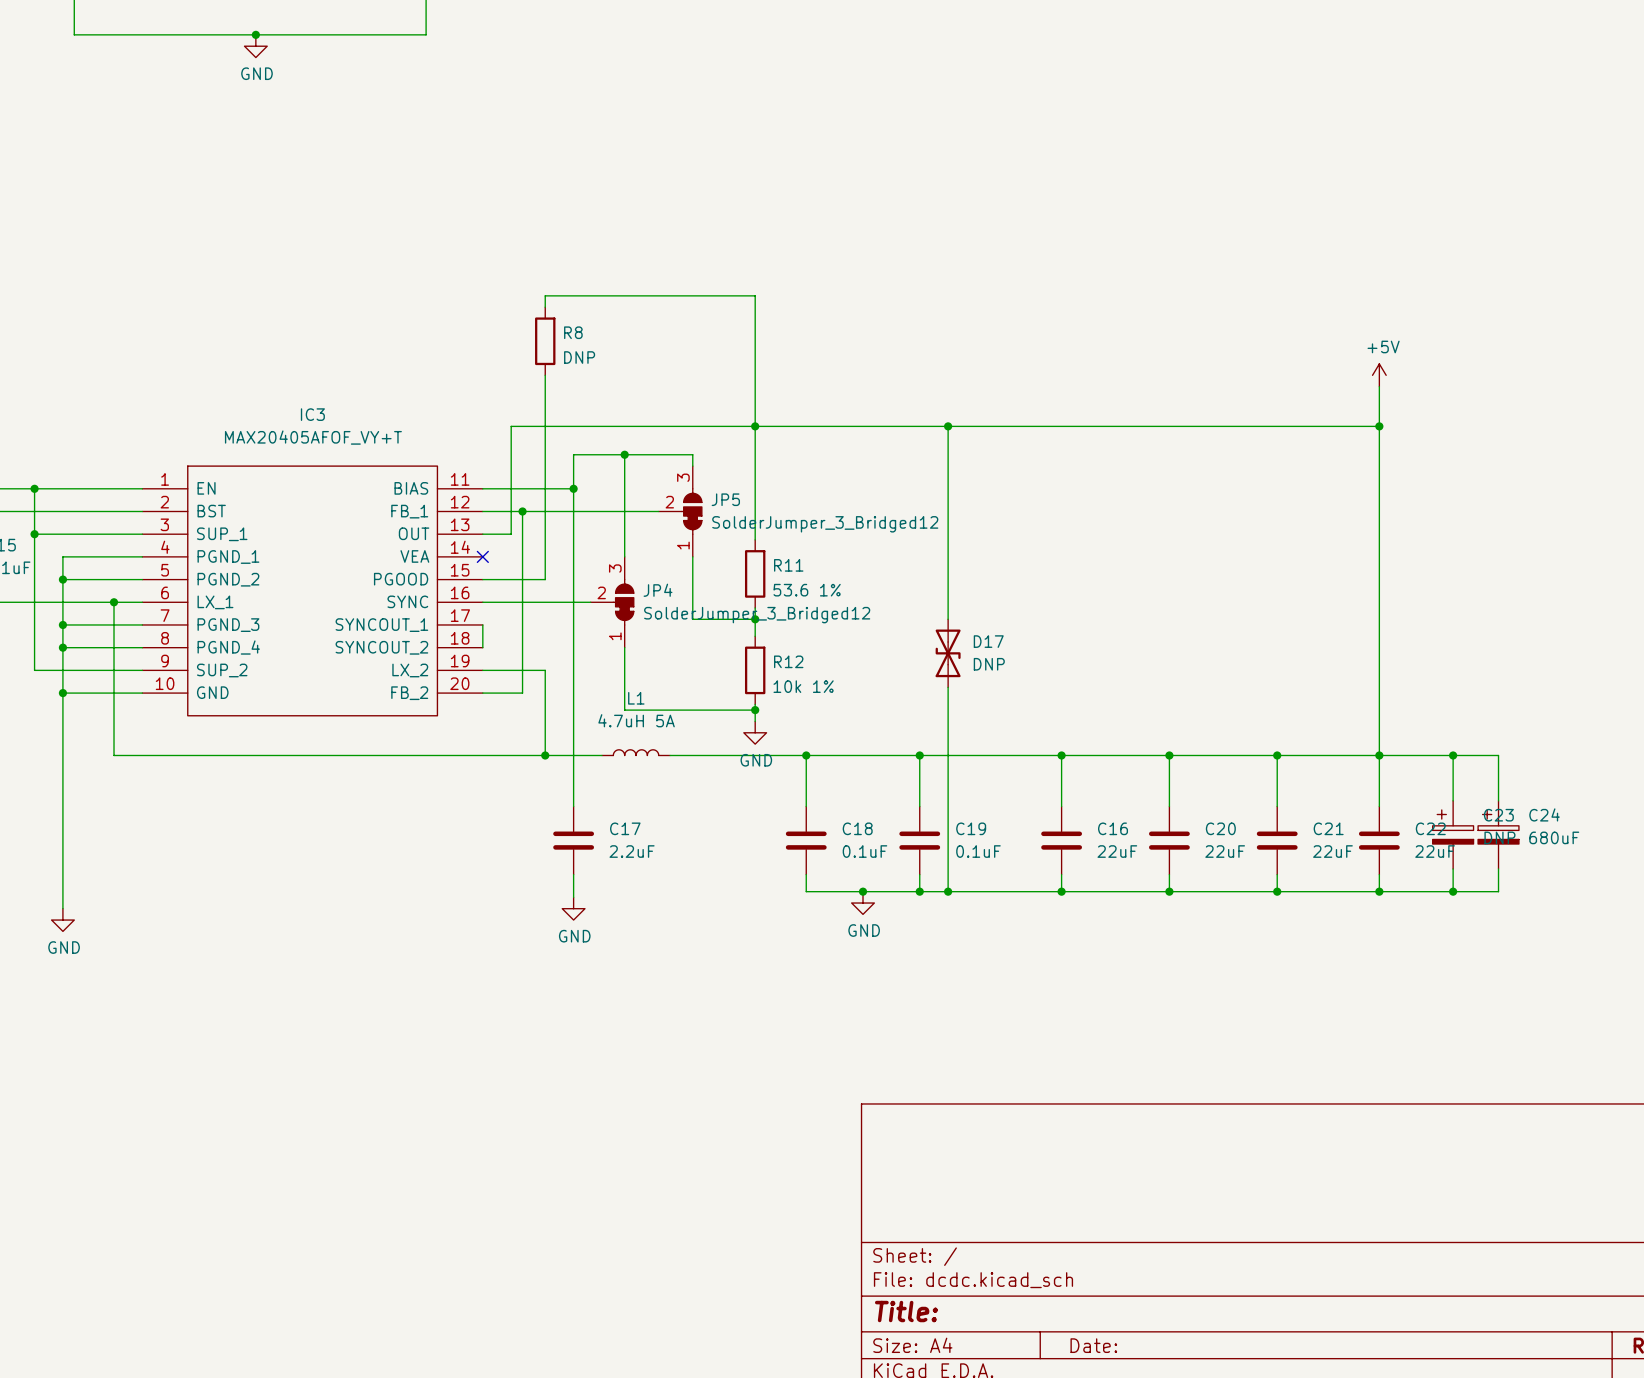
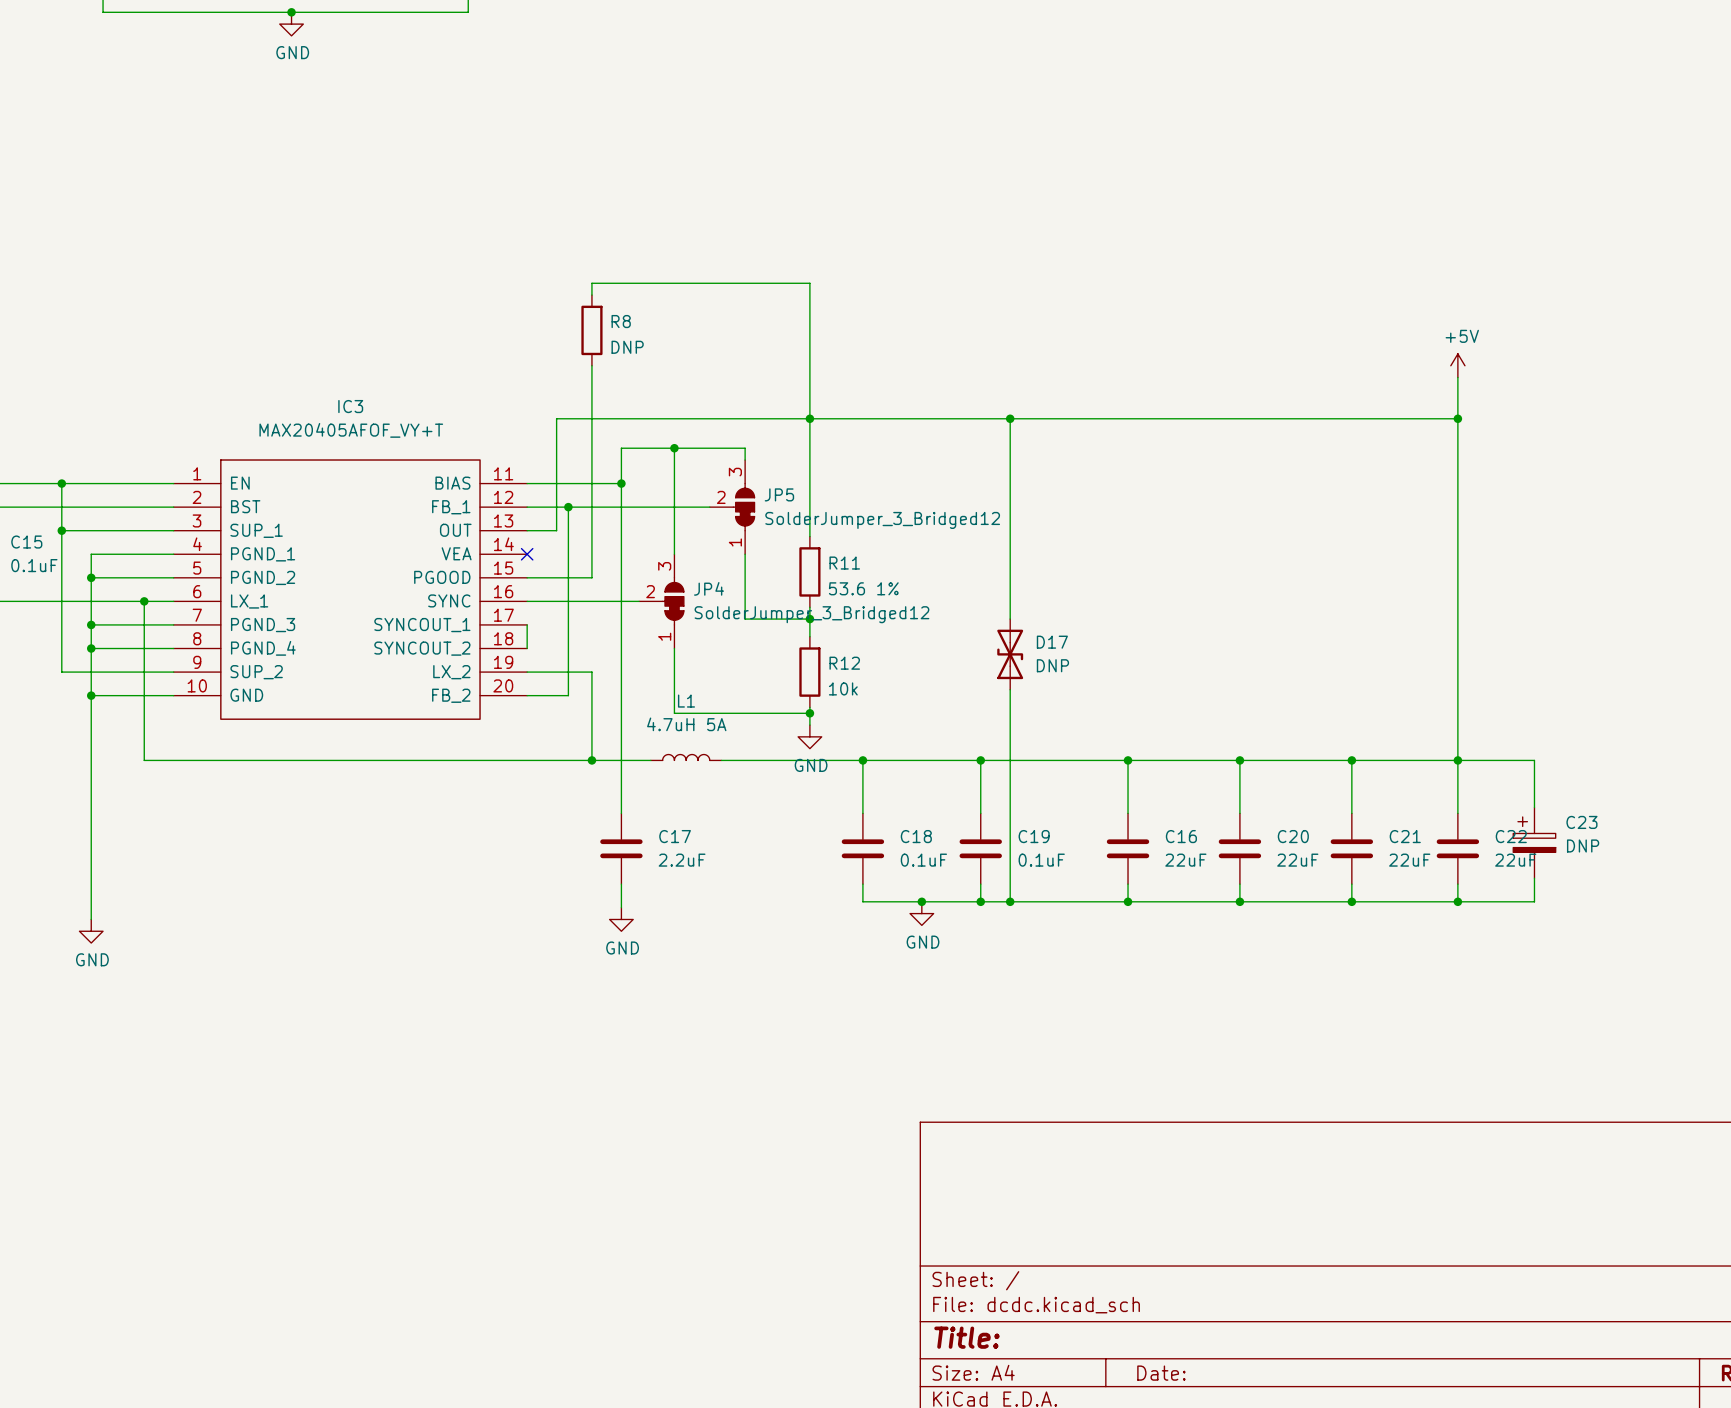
R12 value: 10k 1% (803, 686) -> 10k (843, 688)
wire: (1453, 755) (1498, 755) (1498, 800) -> none
junction: (1453, 755) -> none
C24: 680uF (1498, 834) -> none
wire: (1498, 868) (1498, 891) (1453, 891) -> none
junction: (1453, 891) -> none

